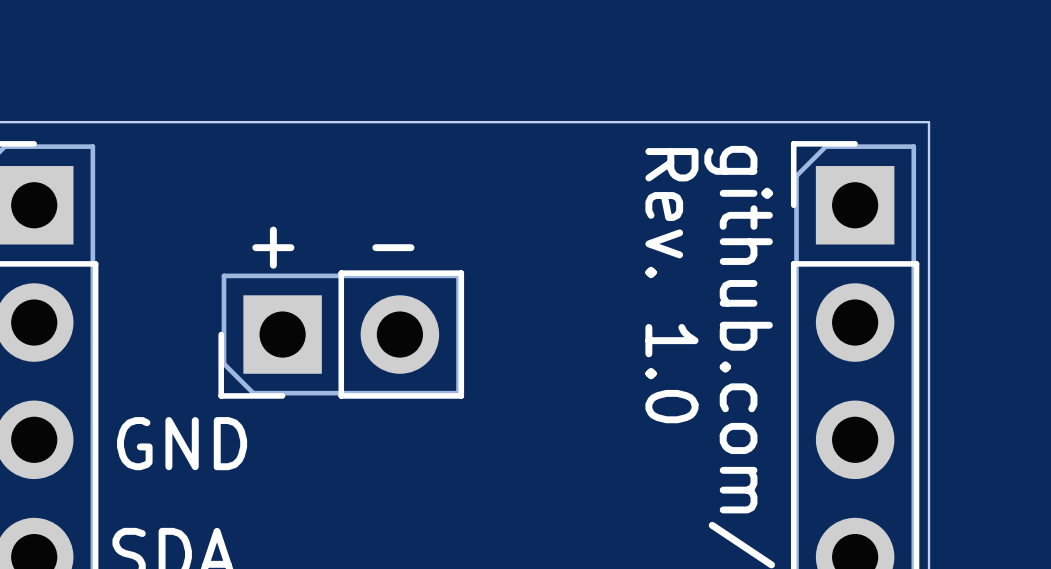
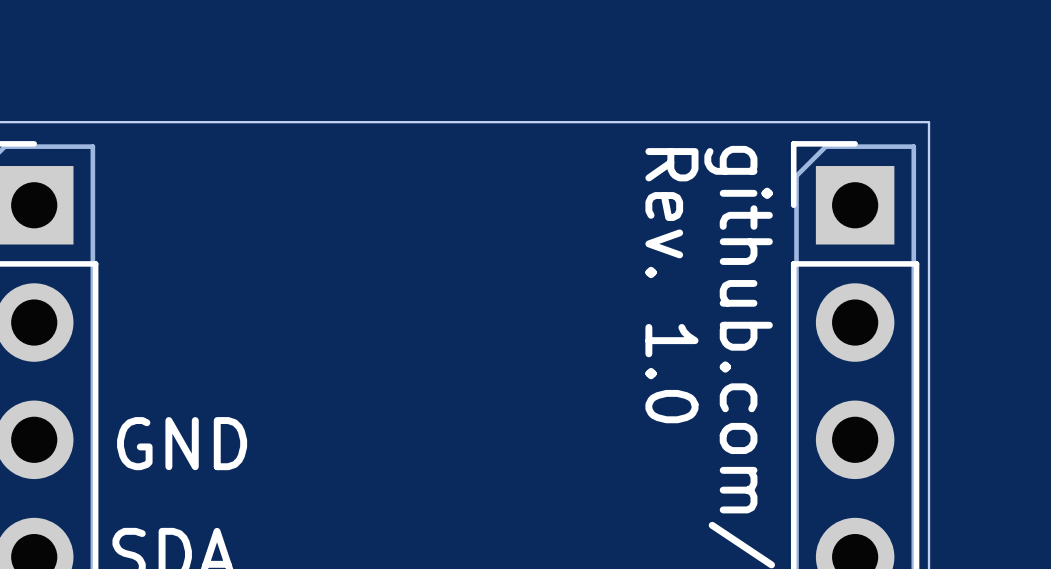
text: + (273, 247) -> none
text: - (393, 247) -> none
part: (341, 334) -> none

